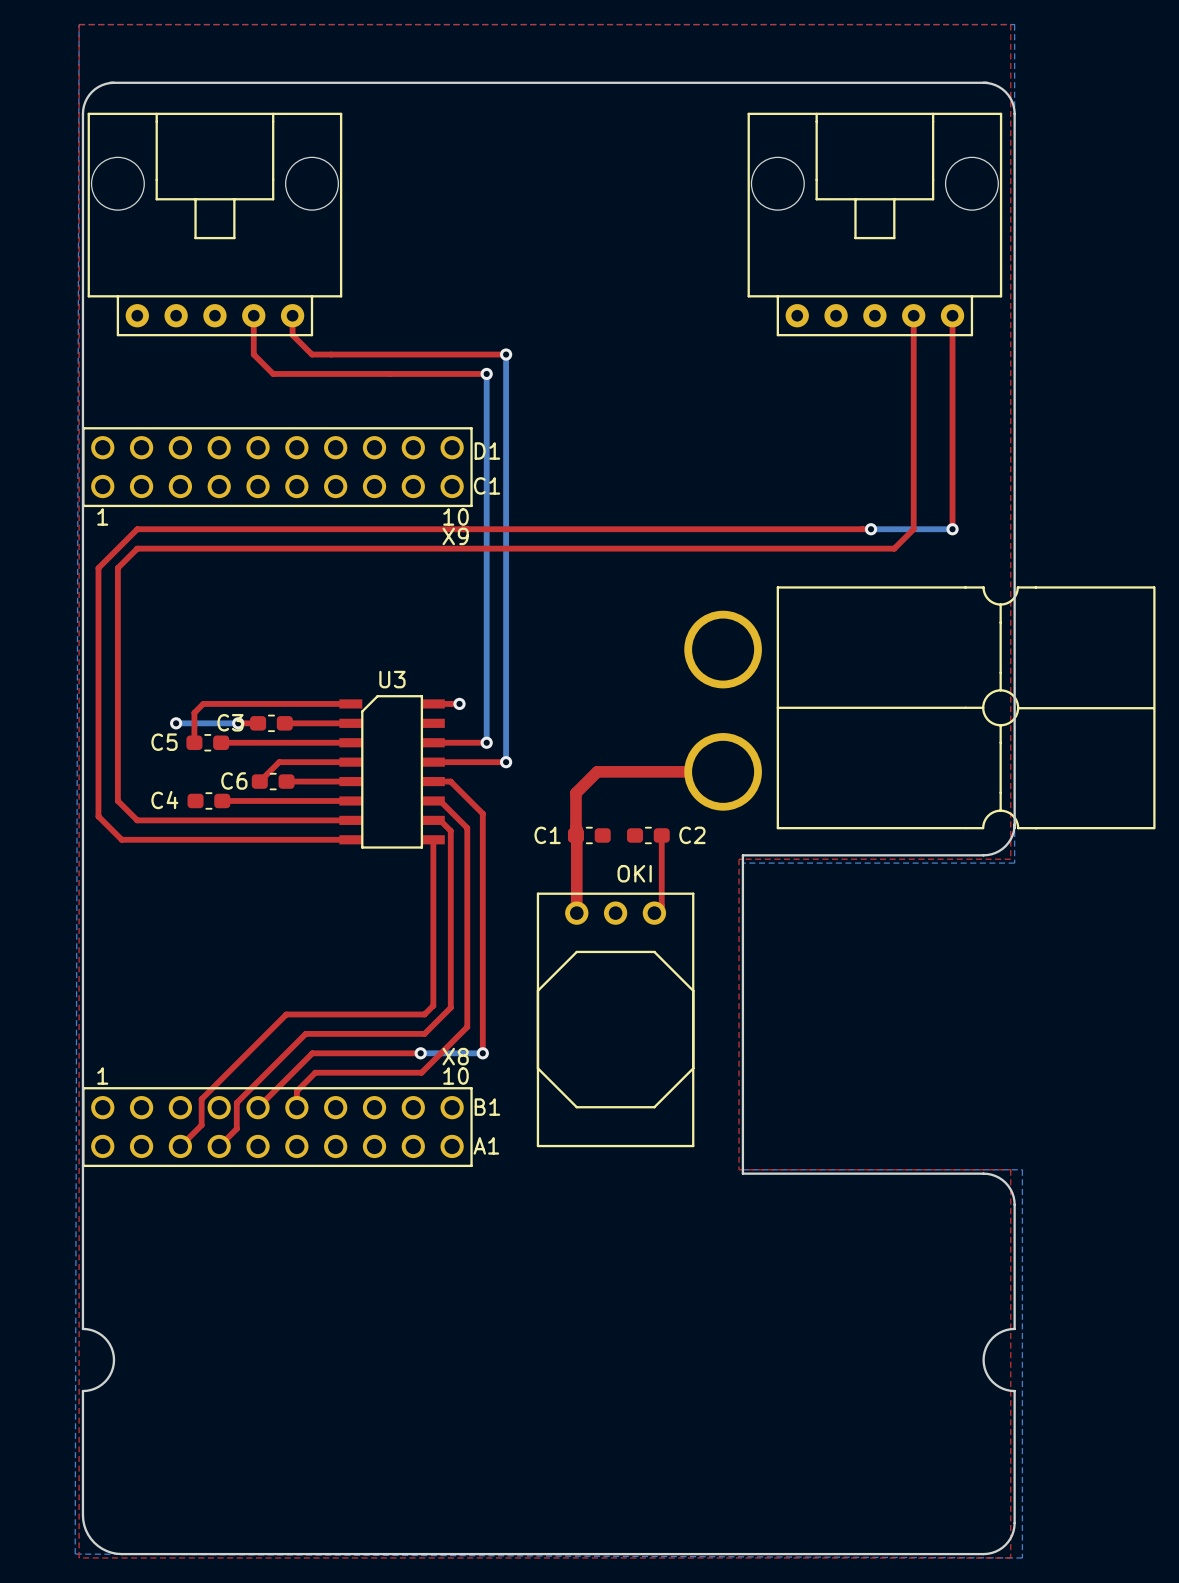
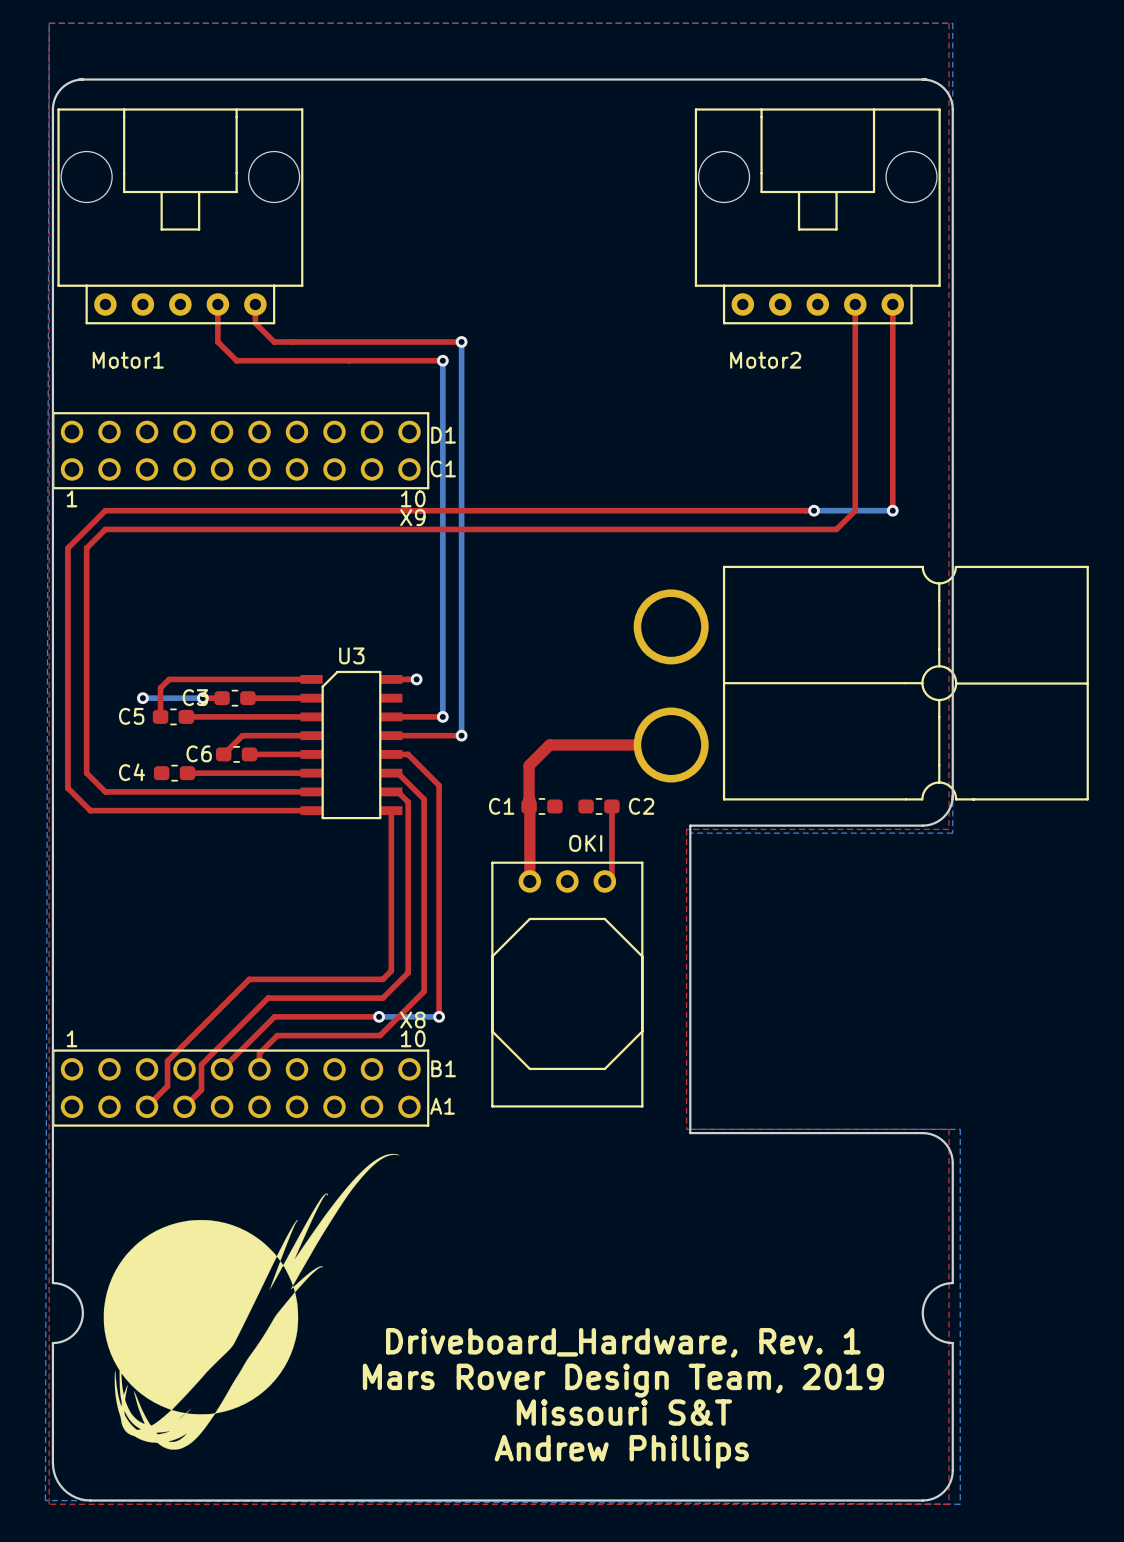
part value: none -> Motor1 (128, 360)
part value: none -> Motor2 (765, 360)
drawing: none -> [103, 1153, 400, 1450]
text: none -> Driveboard_Hardware, Rev. 1 (623, 1342)
text: none -> Mars Rover Design Team, 2019 (623, 1380)
text: none -> Missouri S&T (624, 1412)
text: none -> Andrew Phillips (621, 1451)

